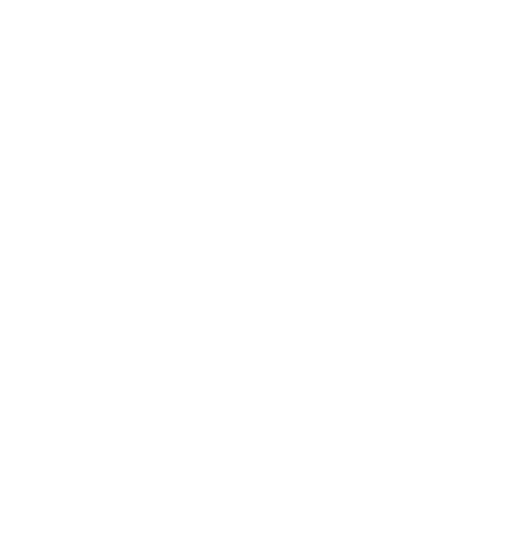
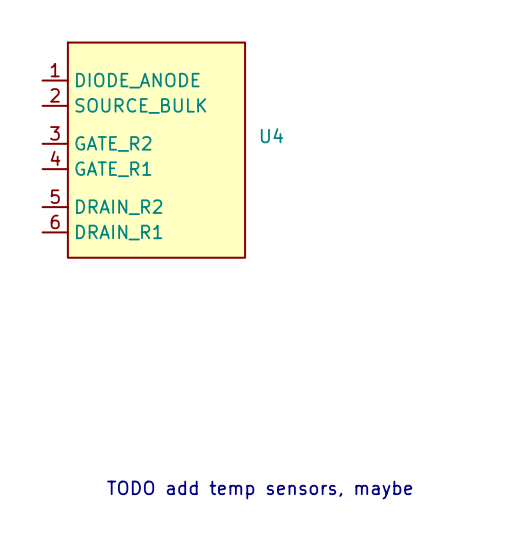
U4: none -> (143, 150)
text: none -> TODO add temp sensors, maybe (259, 489)

